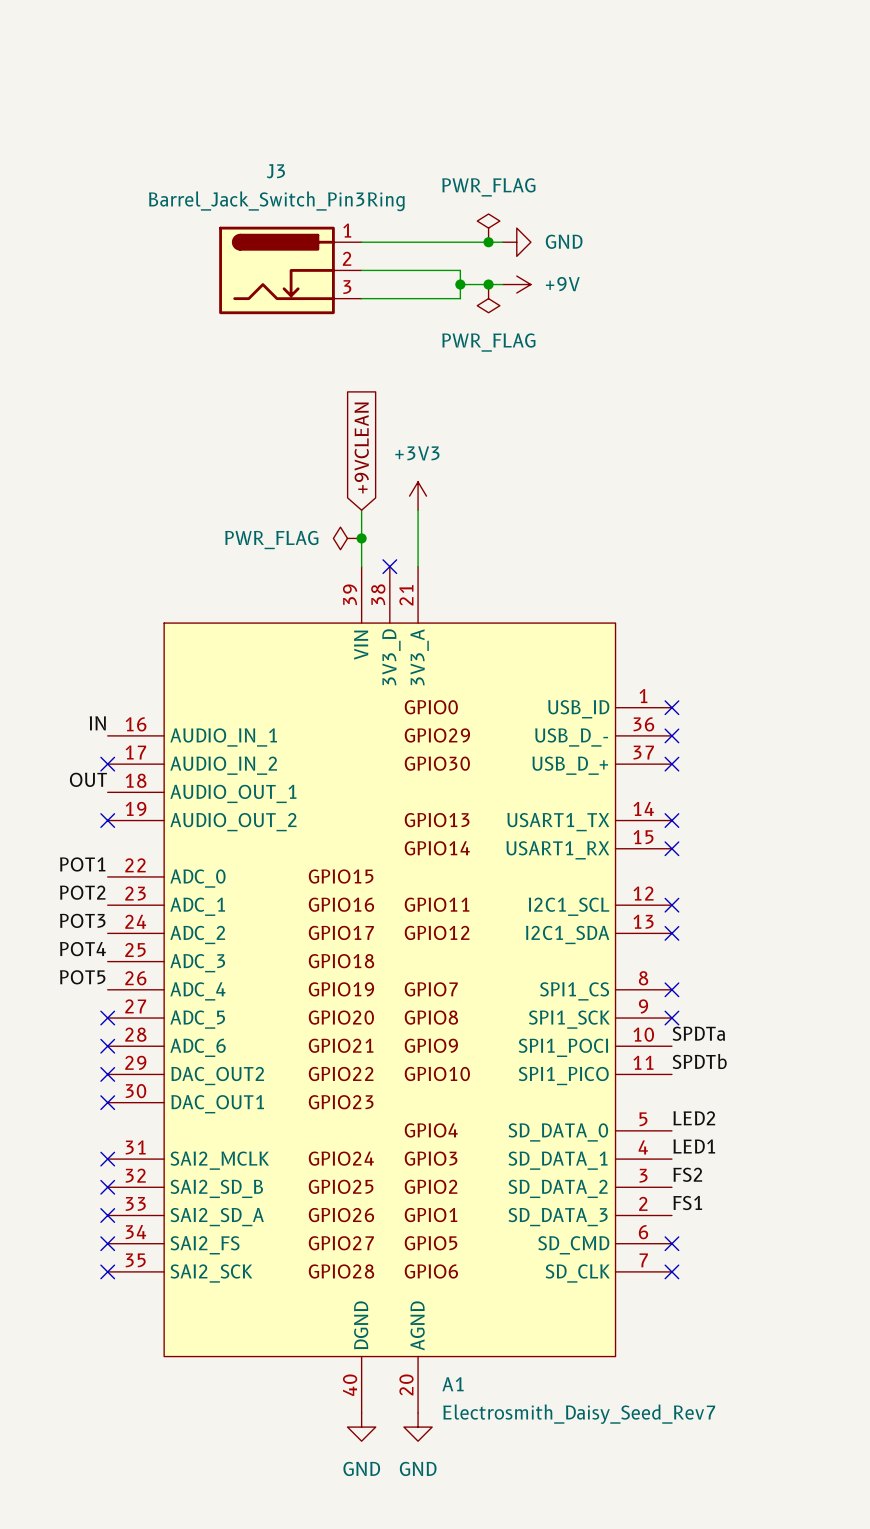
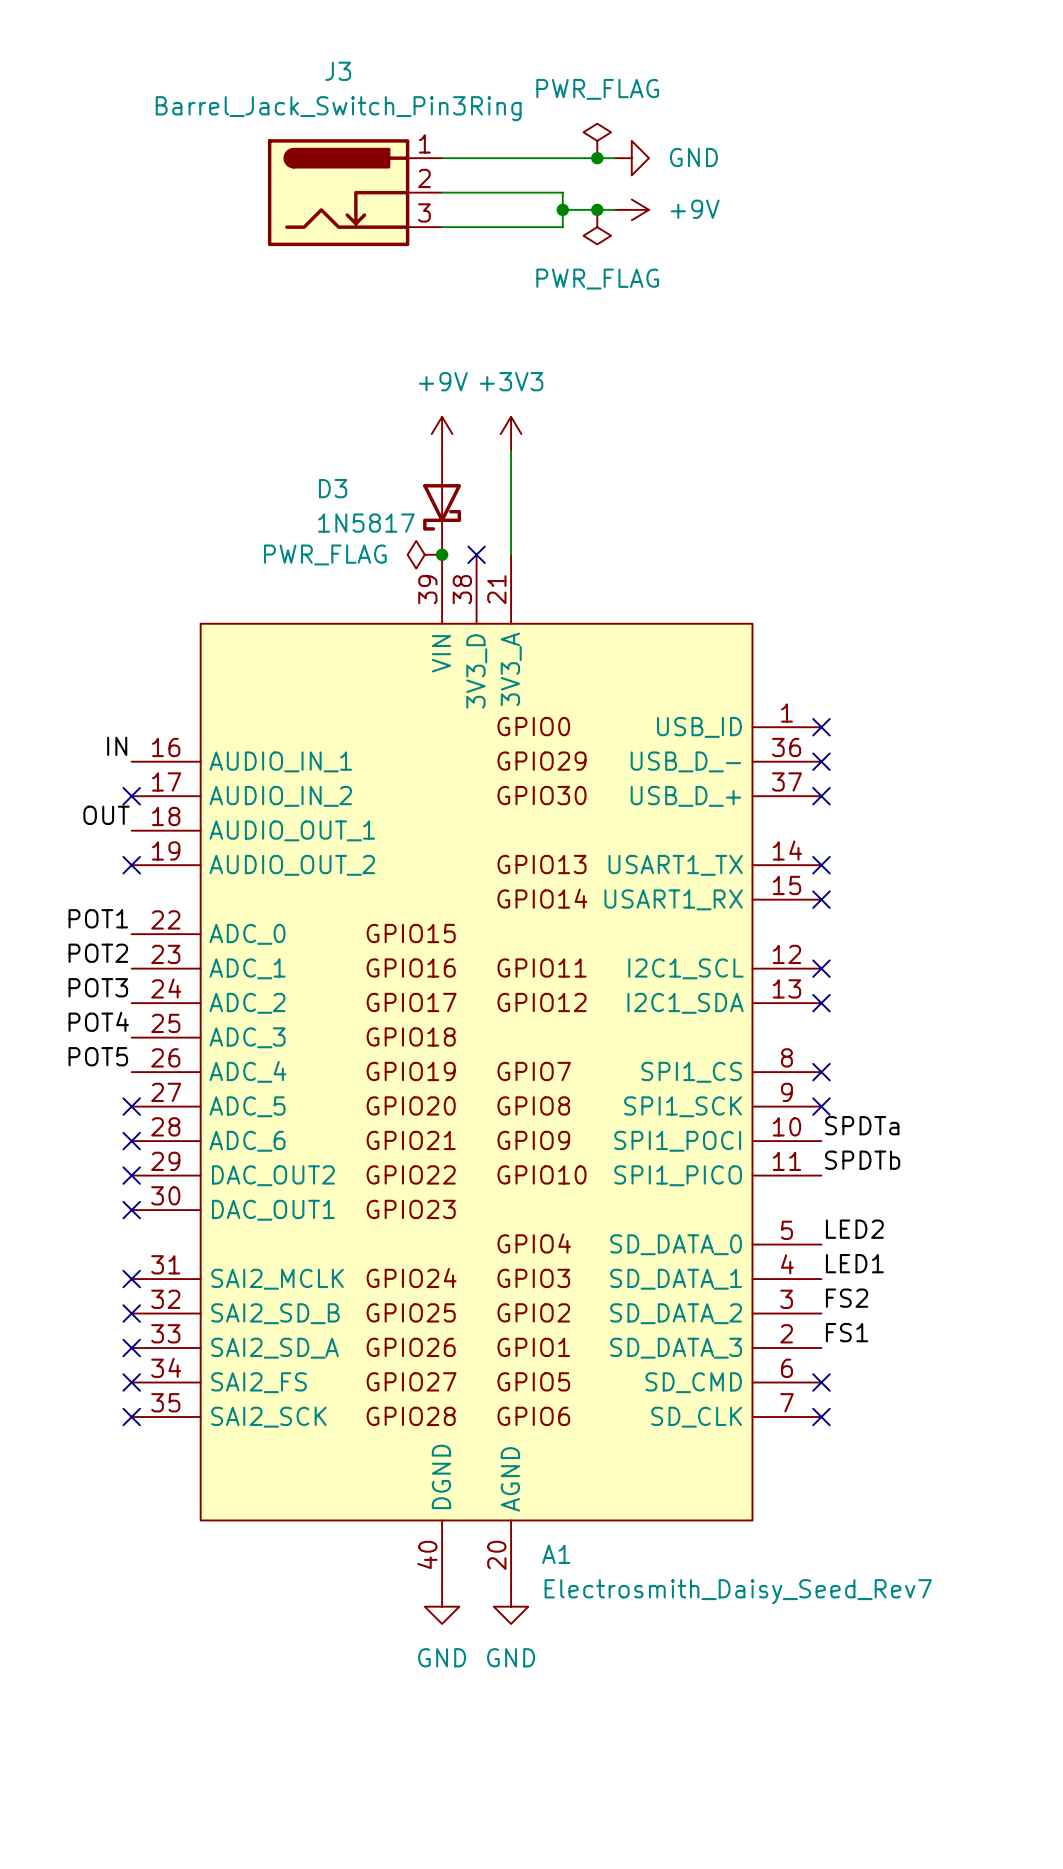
power symbol: none -> PWR_FLAG (597, 140)
junction: none -> (597, 158)
junction: none -> (562, 209)
junction: none -> (597, 209)
power symbol: none -> +9V (631, 209)
power symbol rotation: 0° (488, 228) -> 180° (597, 227)
power symbol position: PWR_FLAG (488, 228) -> PWR_FLAG (597, 227)
wire: (361, 242) (502, 242) -> (442, 158) (614, 158)
junction: (488, 242) -> none
power symbol position: GND (516, 242) -> GND (631, 158)
J3 position: (290, 270) -> (355, 192)
wire: (361, 270) (460, 270) (460, 298) (361, 298) -> (442, 192) (562, 192) (562, 227) (442, 227)
wire: (460, 284) (502, 284) -> (562, 209) (614, 209)
junction: (460, 284) -> none
junction: (488, 284) -> none
power symbol: +9V (516, 284) -> none
power symbol: PWR_FLAG (488, 298) -> none
power symbol: none -> +9V (442, 434)
wire: none -> (511, 451) (511, 554)
D3: none -> 1N5817 (442, 503)
global label: +9VCLEAN (361, 447) -> none
junction: none -> (442, 554)
no-connect mark: none -> (476, 554)
power symbol position: +3V3 (418, 496) -> +3V3 (511, 434)
power symbol position: PWR_FLAG (347, 538) -> PWR_FLAG (424, 554)
junction: (361, 538) -> none
no-connect mark: (389, 566) -> none
no-connect mark: none -> (821, 727)
no-connect mark: none -> (821, 761)
no-connect mark: none -> (131, 796)
no-connect mark: none -> (821, 796)
label: none -> OUT (106, 815)
no-connect mark: none -> (131, 865)
label position: IN (97, 723) -> IN (117, 746)
label: none -> POT1 (98, 918)
no-connect mark: (107, 764) -> none
no-connect mark: (671, 764) -> none
label: OUT (88, 779) -> POT2 (98, 953)
no-connect mark: none -> (821, 968)
no-connect mark: (107, 820) -> none
no-connect mark: (671, 848) -> none
label: POT1 (82, 864) -> POT5 (98, 1056)
no-connect mark: none -> (821, 1072)
label: POT2 (82, 892) -> none
no-connect mark: none -> (131, 1106)
label position: POT3 (82, 920) -> POT3 (98, 987)
label: none -> SPDTa (862, 1125)
no-connect mark: none -> (131, 1141)
no-connect mark: (671, 933) -> none
label: none -> SPDTb (862, 1160)
label position: POT4 (82, 949) -> POT4 (98, 1021)
no-connect mark: none -> (131, 1175)
label: POT5 (82, 977) -> none
no-connect mark: none -> (131, 1210)
A1 position: (389, 989) -> (476, 1072)
no-connect mark: (671, 989) -> none
no-connect mark: (107, 1018) -> none
no-connect mark: (671, 1018) -> none
label: SPDTa (698, 1033) -> LED1 (854, 1263)
label: SPDTb (699, 1061) -> FS2 (847, 1298)
label position: LED2 (694, 1118) -> LED2 (854, 1229)
no-connect mark: none -> (131, 1382)
no-connect mark: none -> (821, 1382)
label: LED1 (694, 1146) -> none
no-connect mark: none -> (821, 1417)
label: FS2 (687, 1174) -> none
no-connect mark: (107, 1187) -> none
label position: FS1 (687, 1202) -> FS1 (847, 1332)
no-connect mark: (107, 1215) -> none
no-connect mark: (107, 1243) -> none
no-connect mark: (671, 1243) -> none
no-connect mark: (107, 1271) -> none
no-connect mark: (671, 1271) -> none
power symbol: none -> GND (442, 1606)
power symbol: none -> GND (511, 1606)
power symbol: GND (361, 1427) -> none
power symbol: GND (418, 1427) -> none

